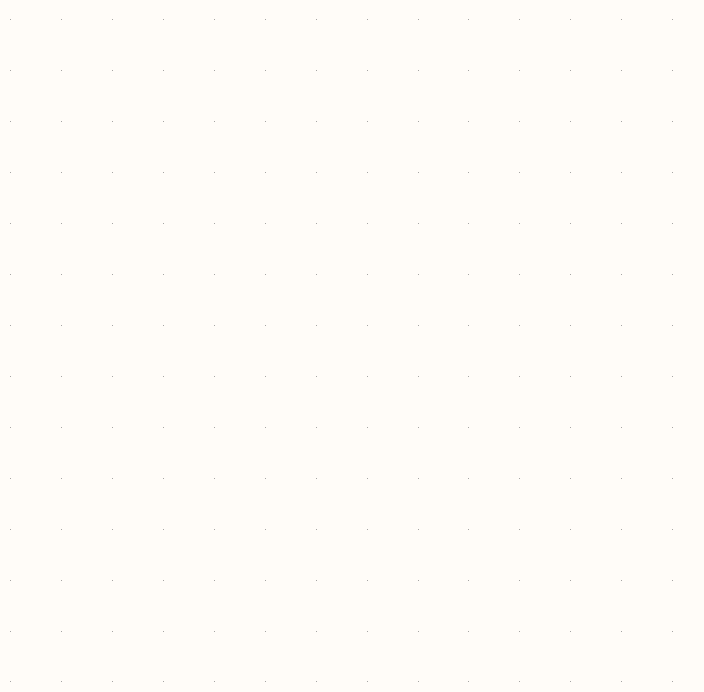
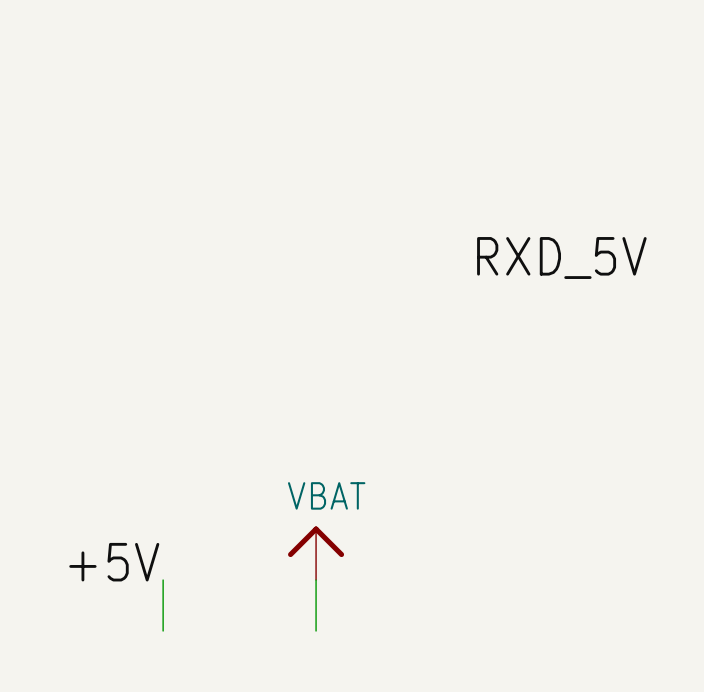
label: none -> RXD_5V (561, 258)
power symbol: none -> VBAT (316, 553)
label: none -> +5V (114, 562)
wire: none -> (163, 580) (163, 631)
wire: none -> (316, 580) (316, 631)

